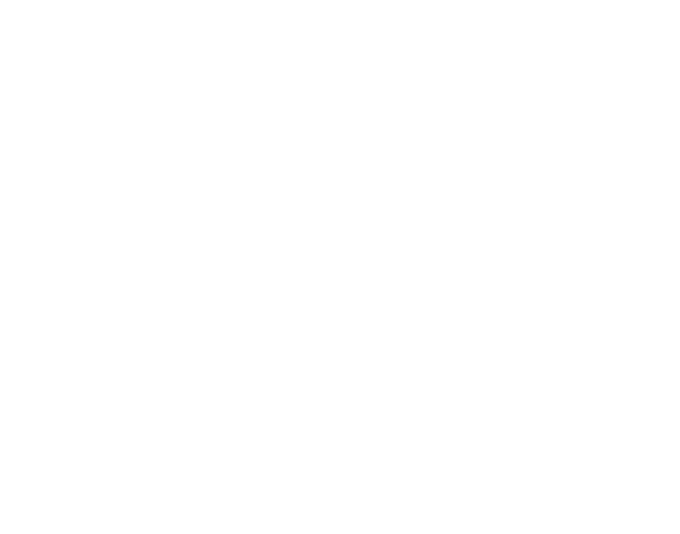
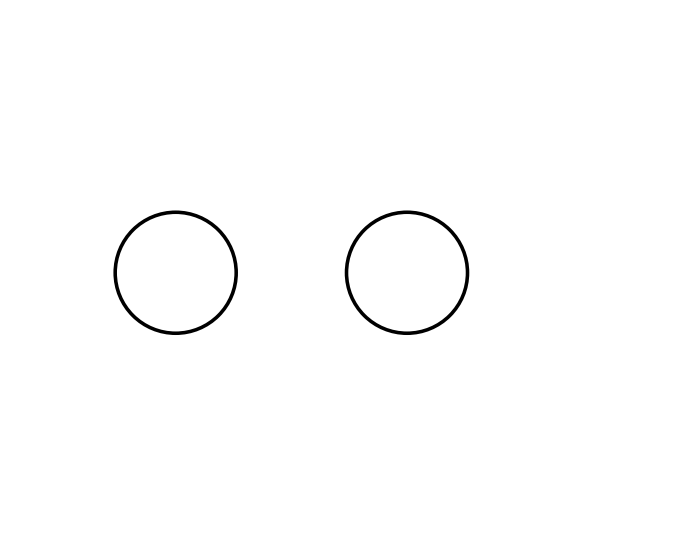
round board edge: none -> [113, 210, 238, 336]
round board edge: none -> [344, 210, 470, 336]

